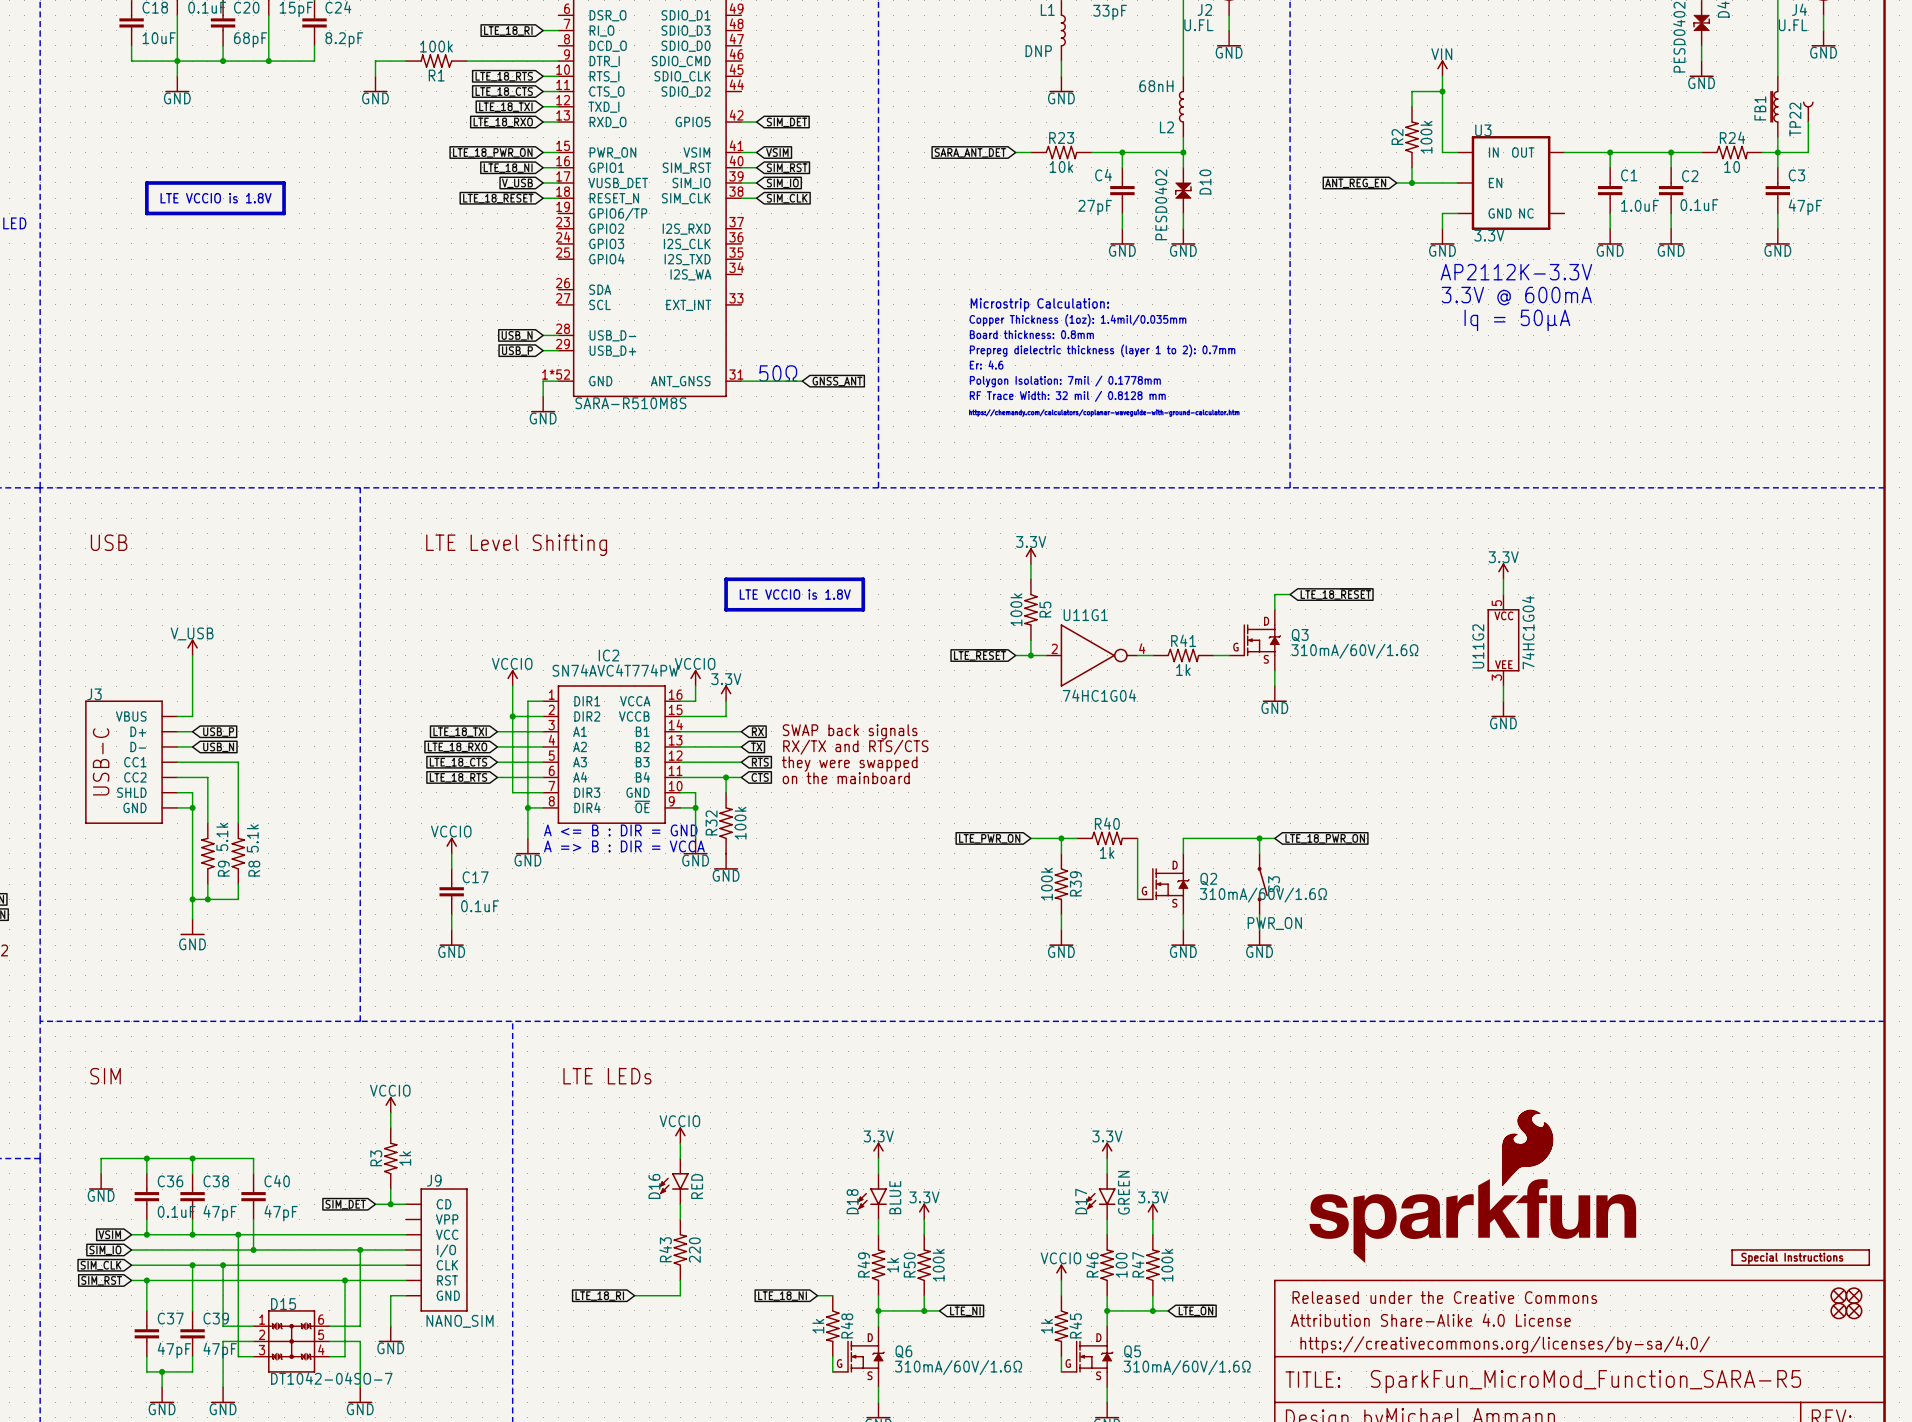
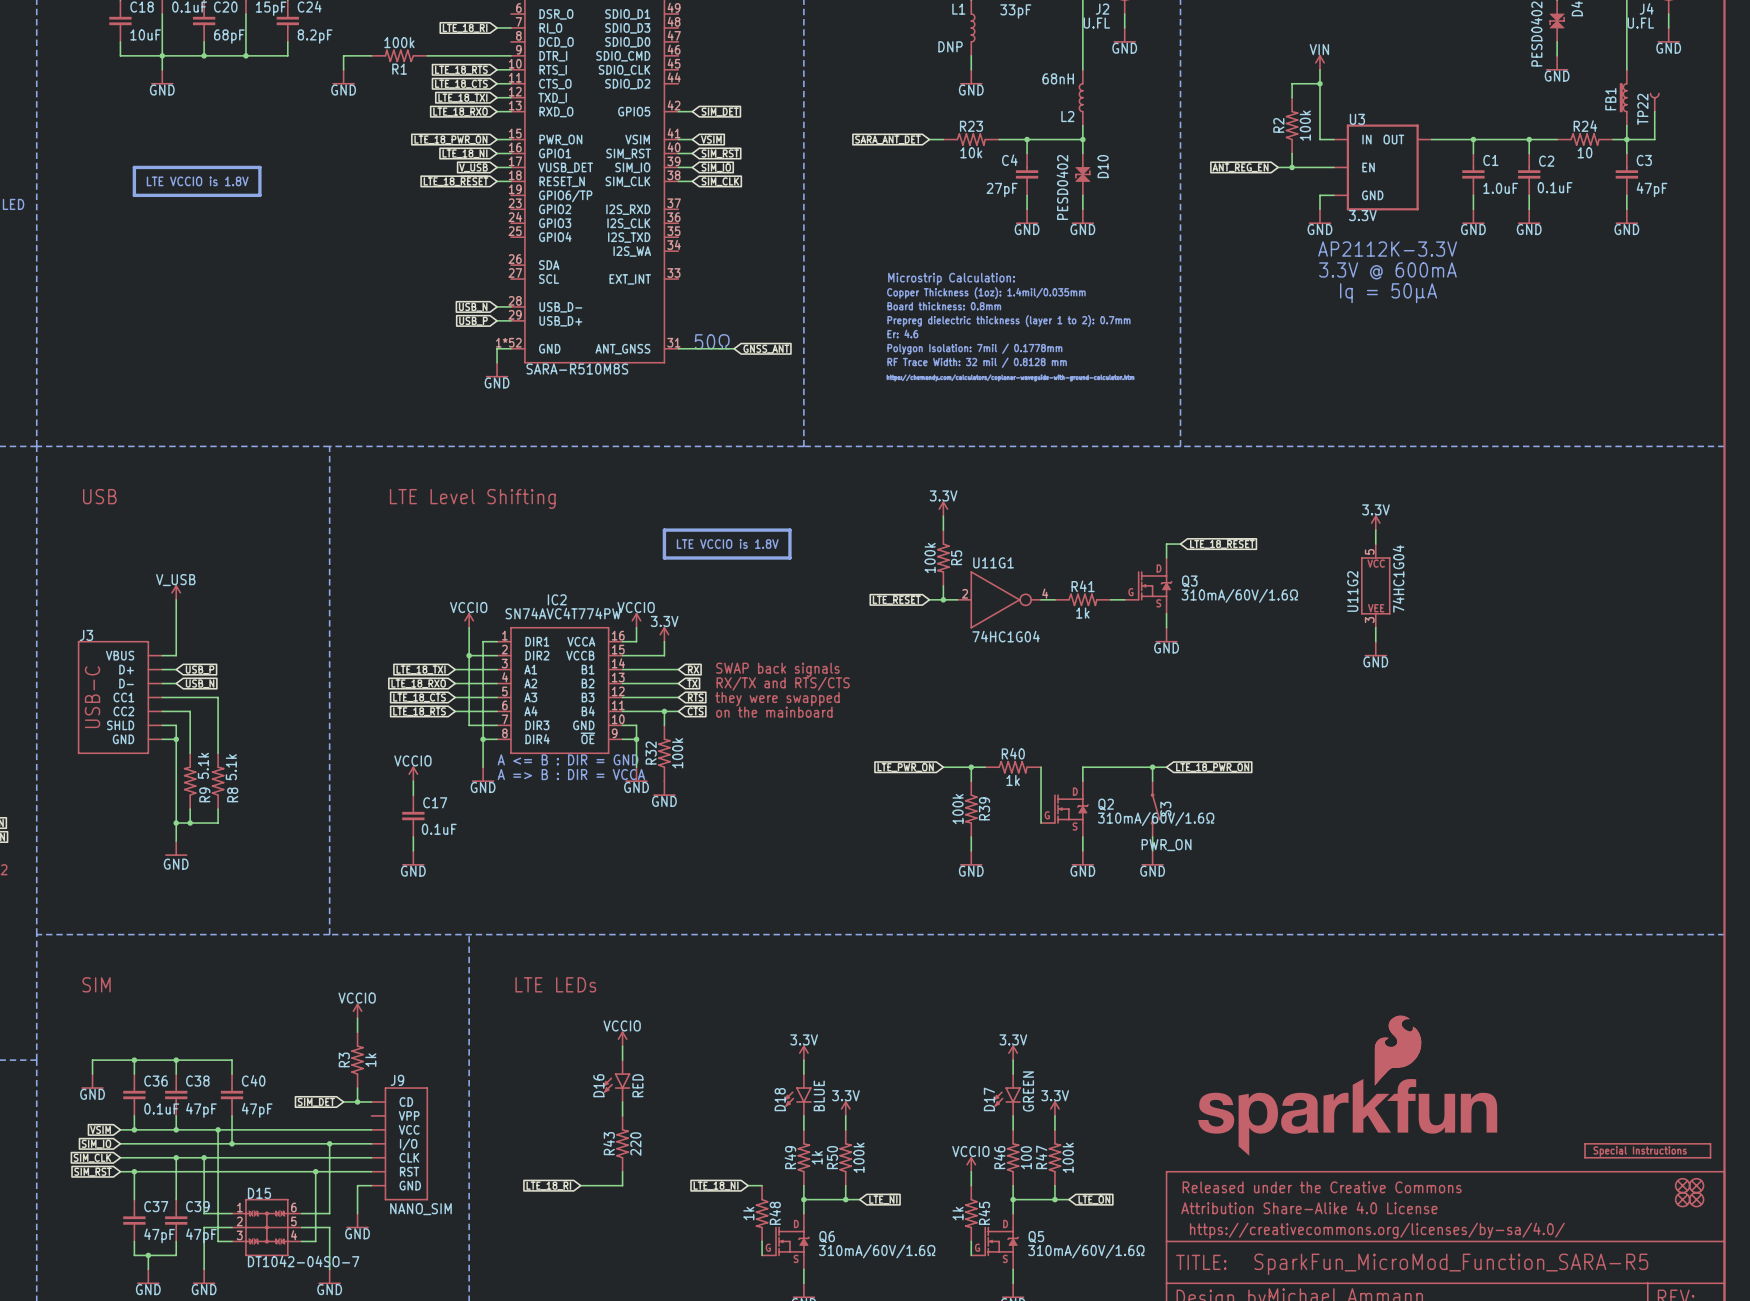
U3 symbol: [1457, 136, 1565, 230] -> [1333, 124, 1432, 211]

